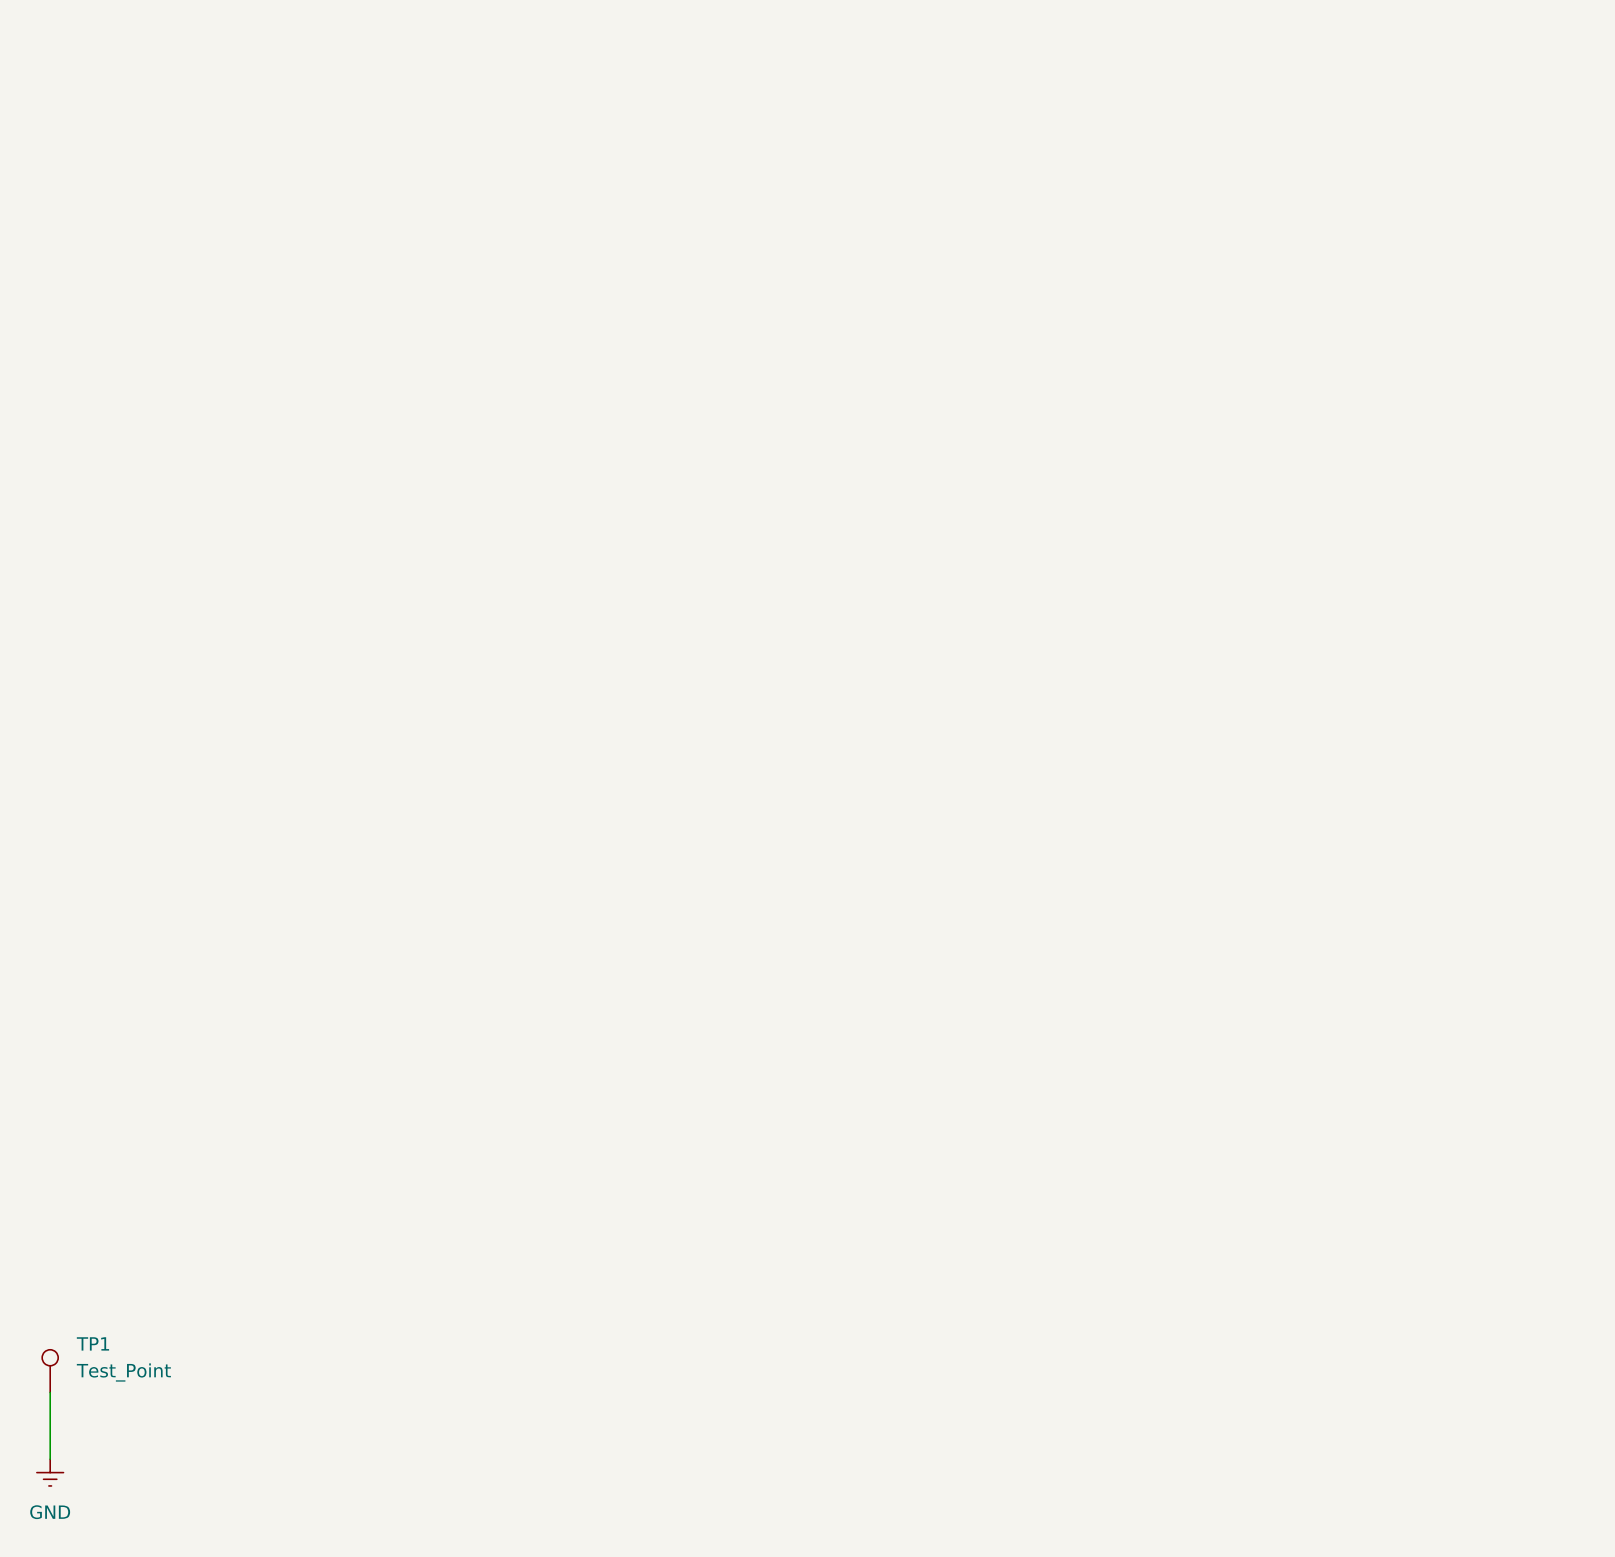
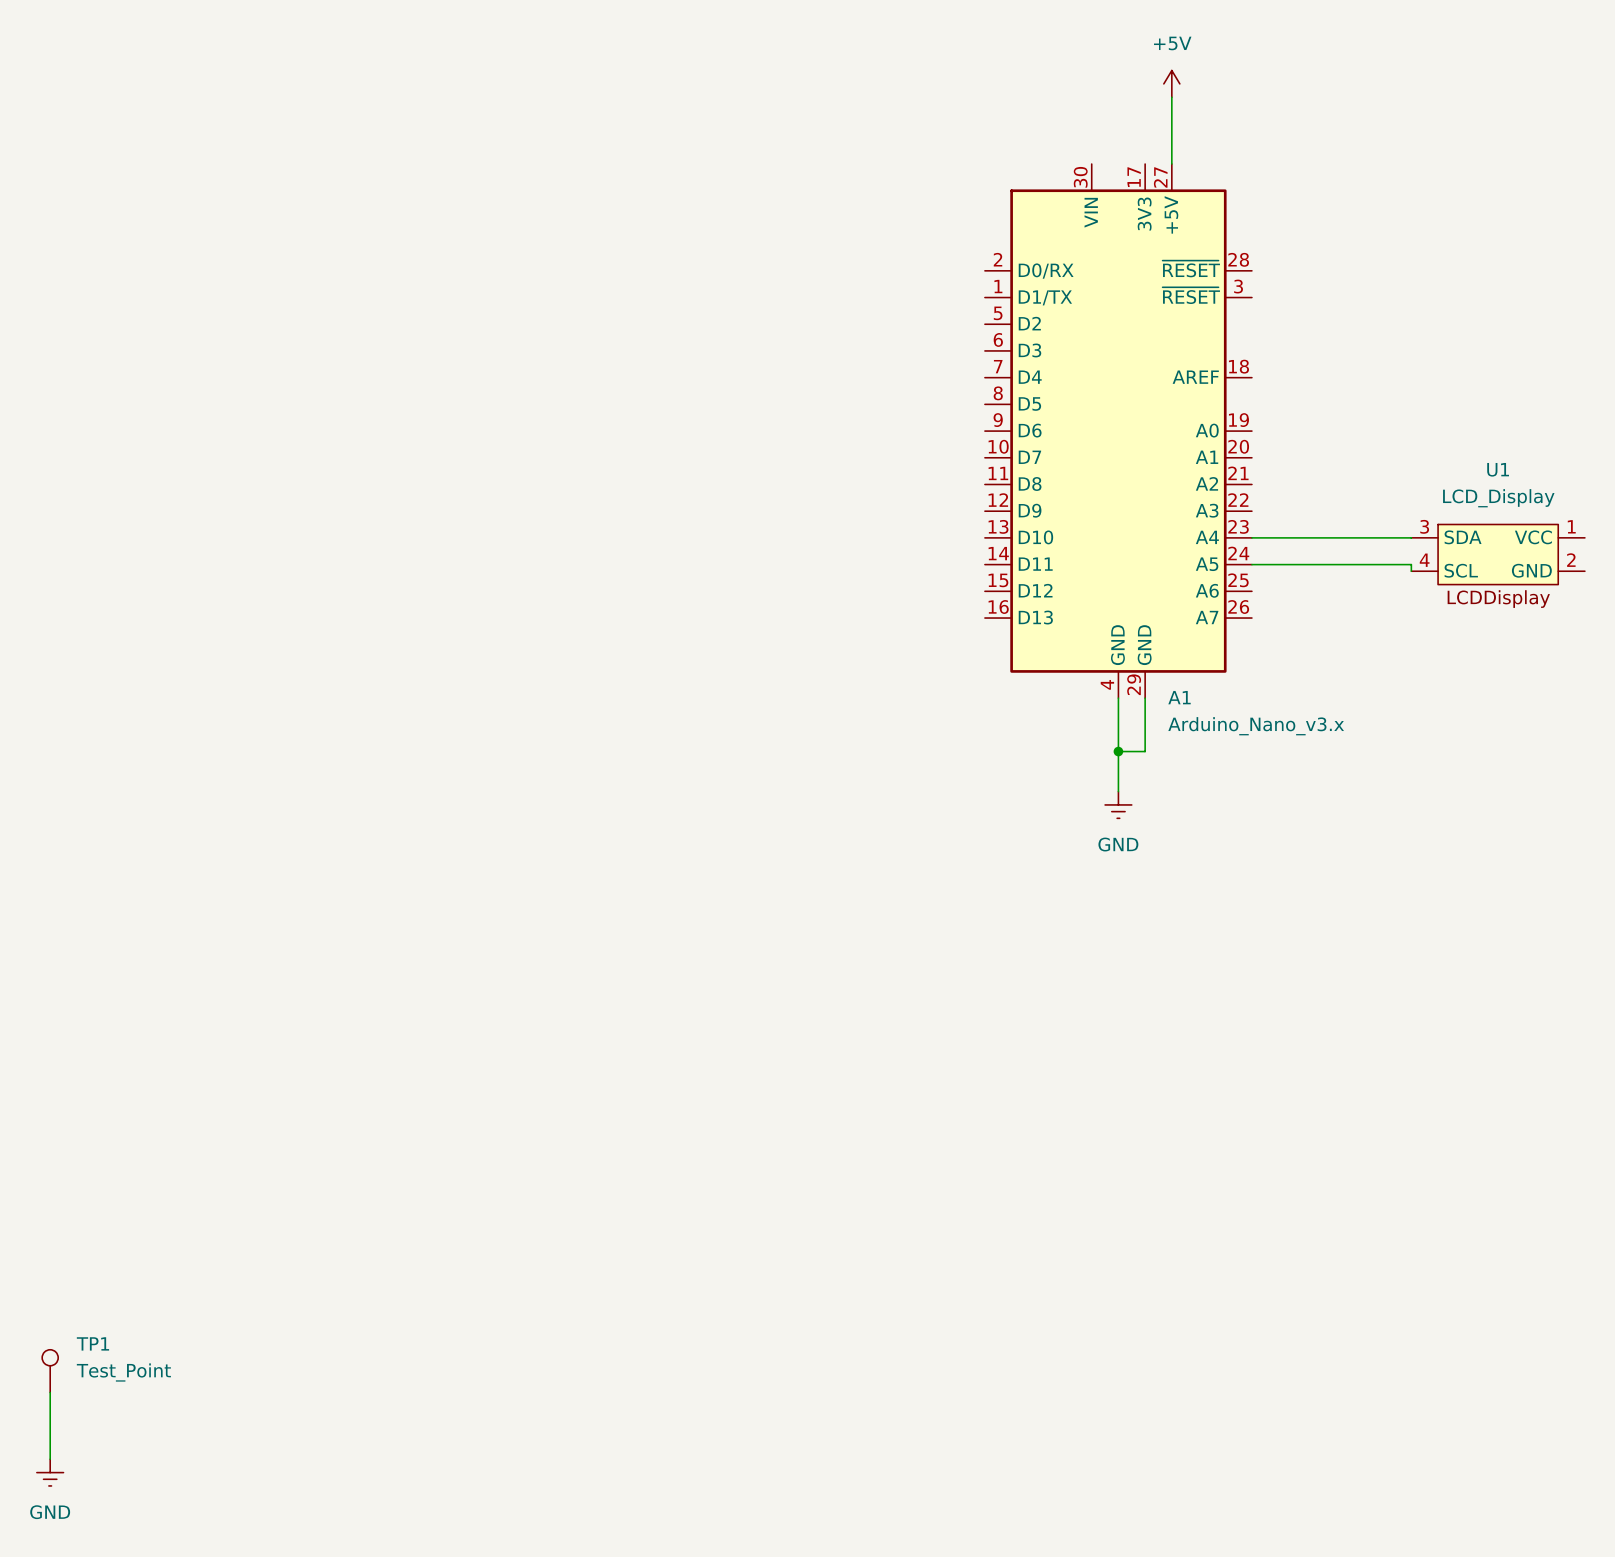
power symbol: none -> +5V (1171, 83)
wire: none -> (1171, 97) (1171, 164)
A1: none -> Arduino_Nano_v3.x (1118, 431)
wire: none -> (1251, 537) (1411, 537)
U1: none -> LCD_Display (1498, 554)
wire: none -> (1251, 564) (1411, 564) (1411, 571)
wire: none -> (1118, 698) (1118, 791)
wire: none -> (1145, 698) (1145, 751) (1118, 751)
junction: none -> (1118, 751)
power symbol: none -> GND (1118, 804)

